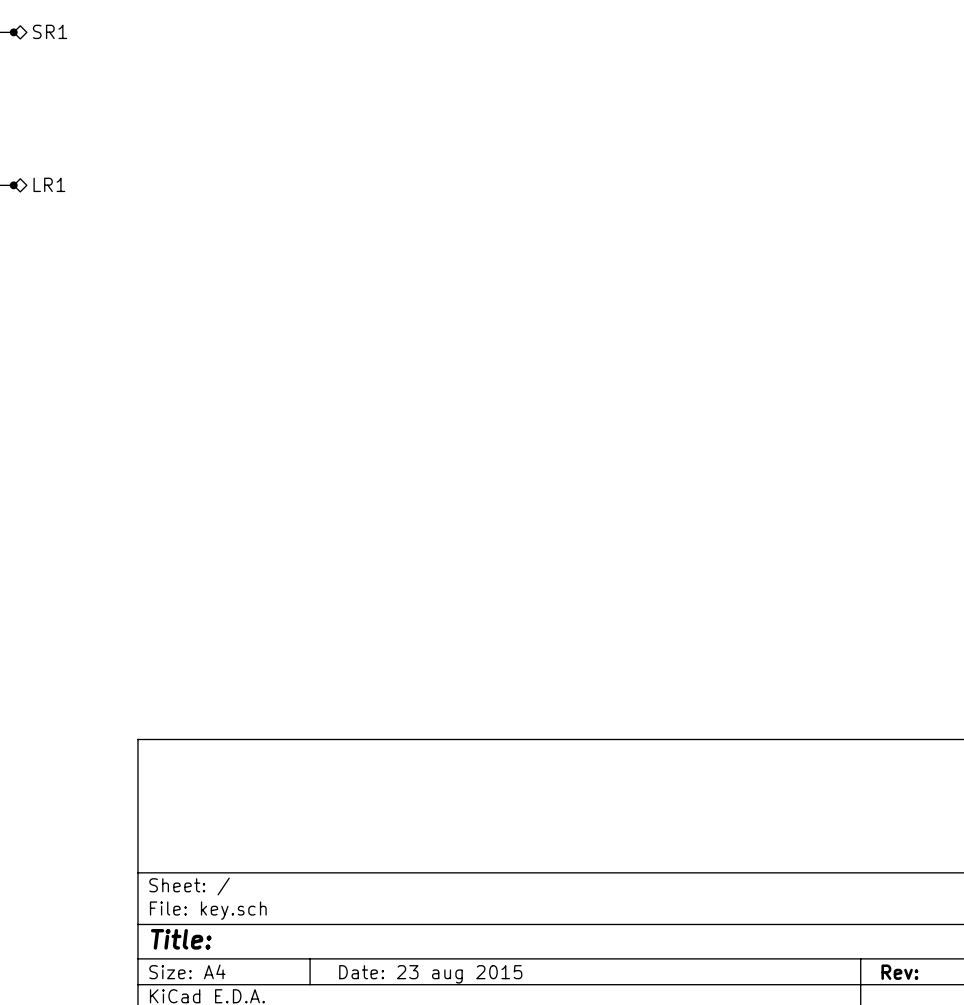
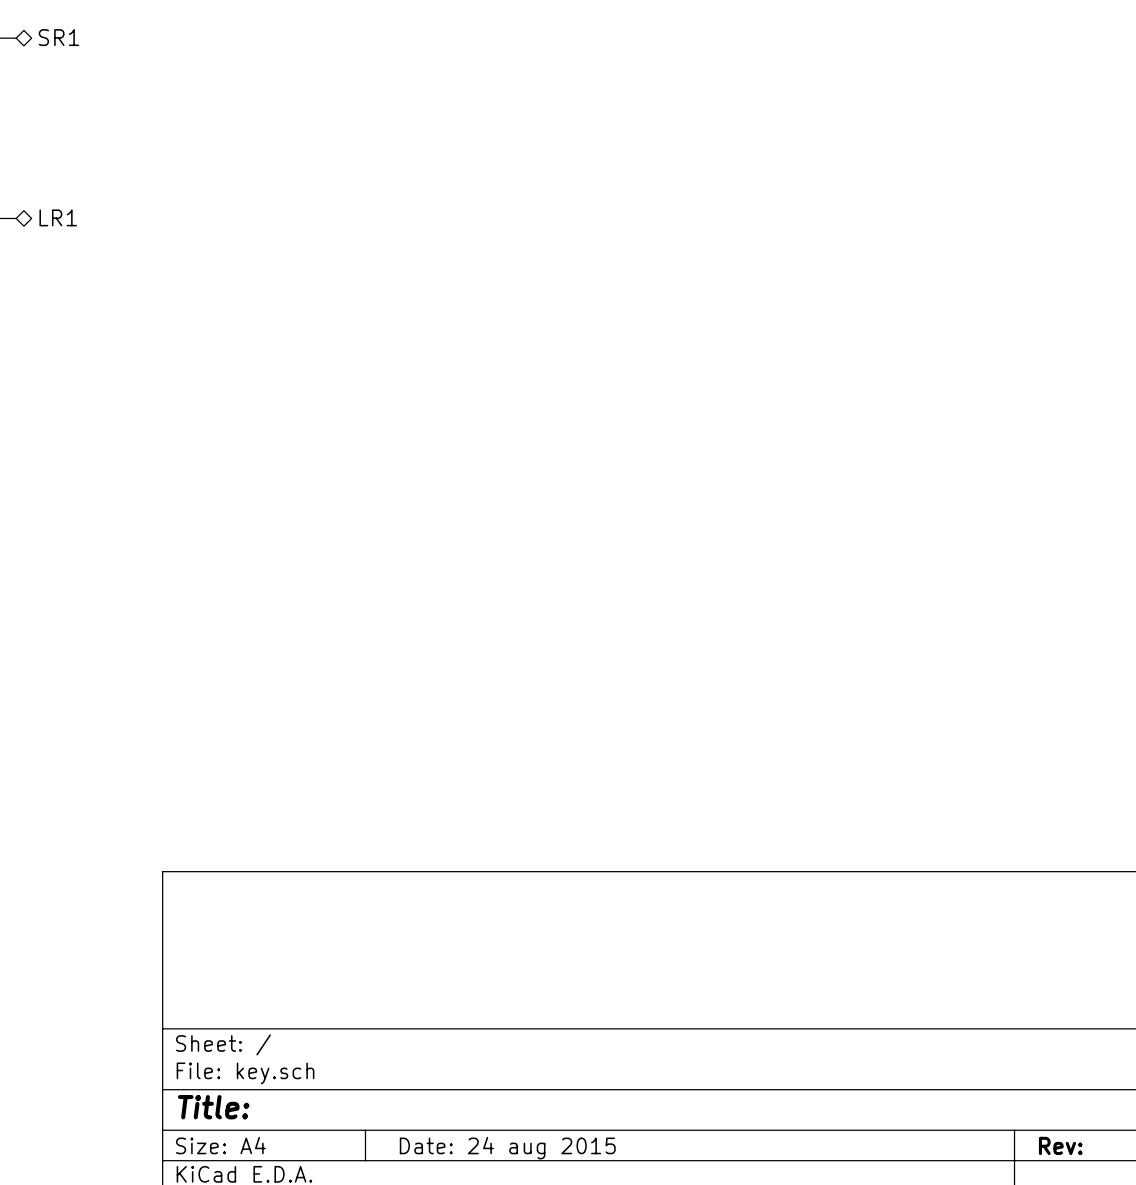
junction: (13, 32) -> none
junction: (13, 185) -> none
title block: Date: 23 aug 2015 (430, 974) -> Date: 24 aug 2015 (507, 1148)

